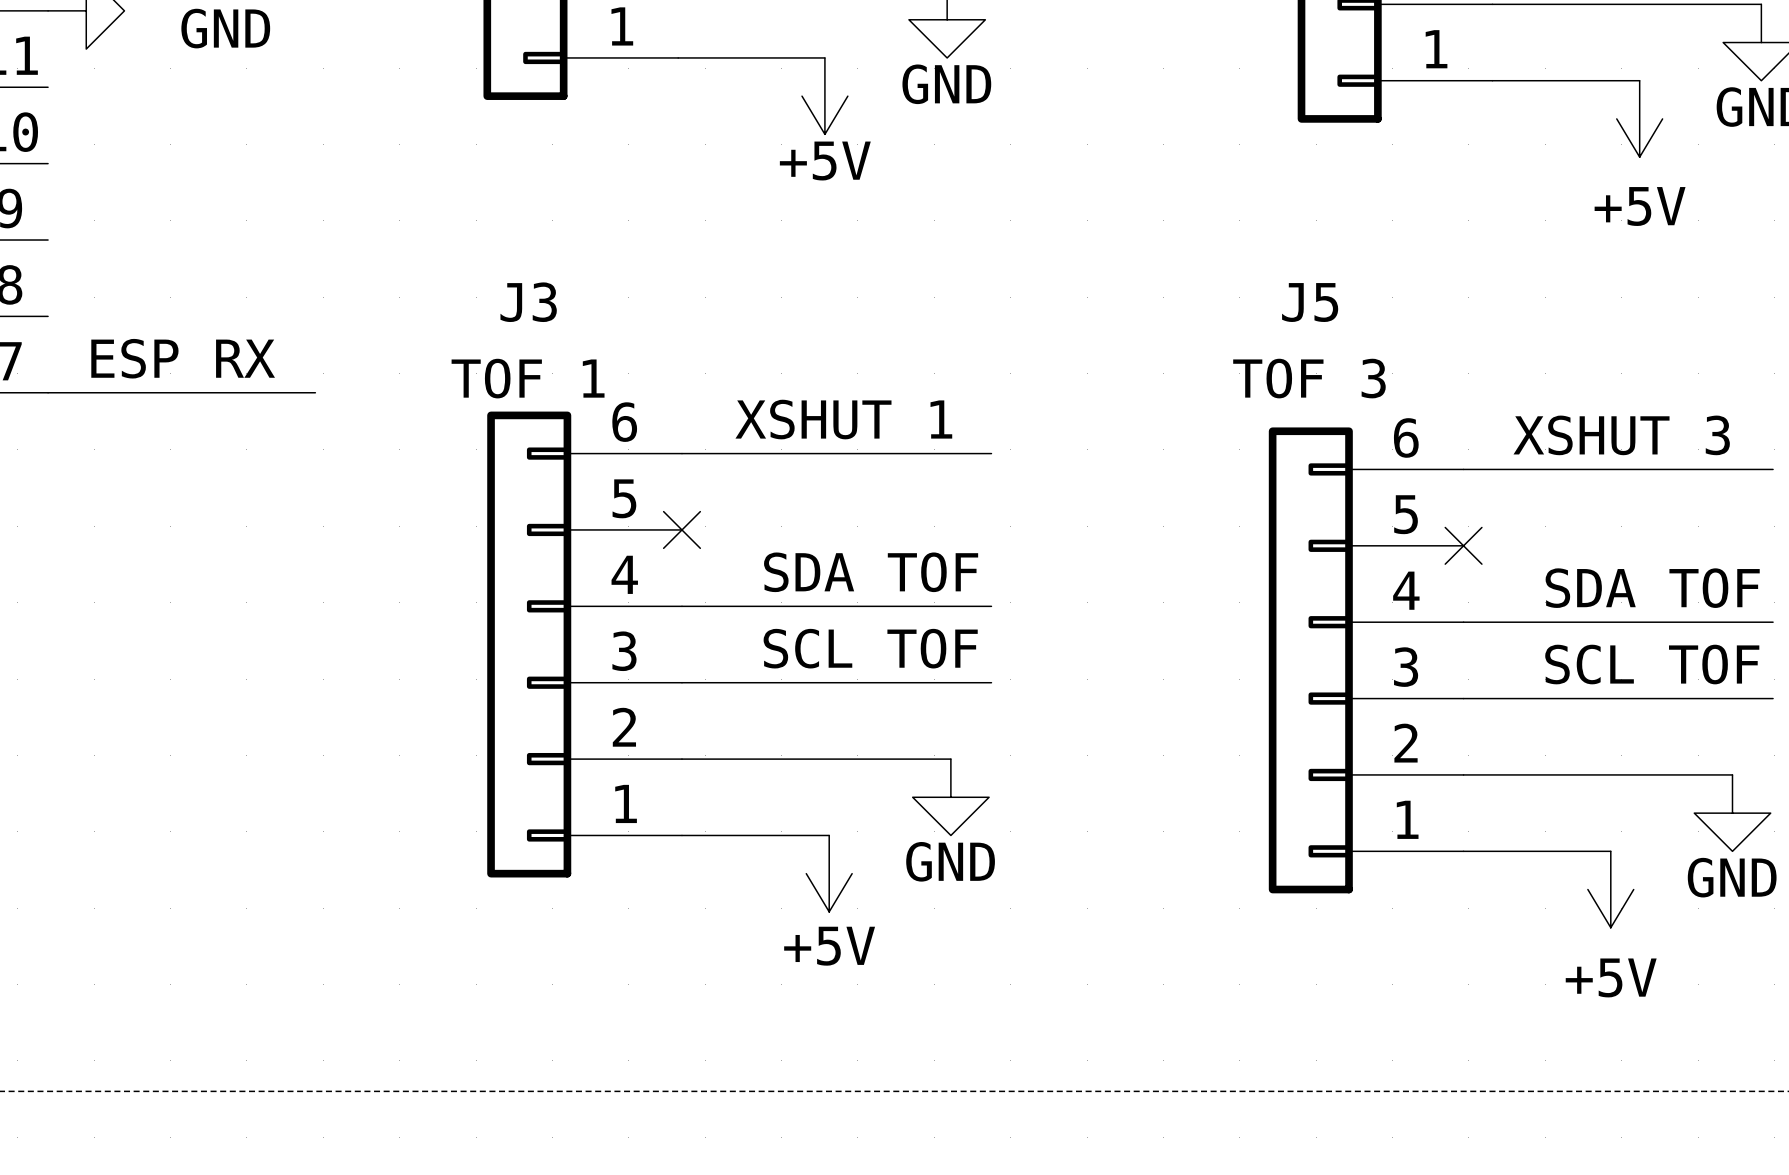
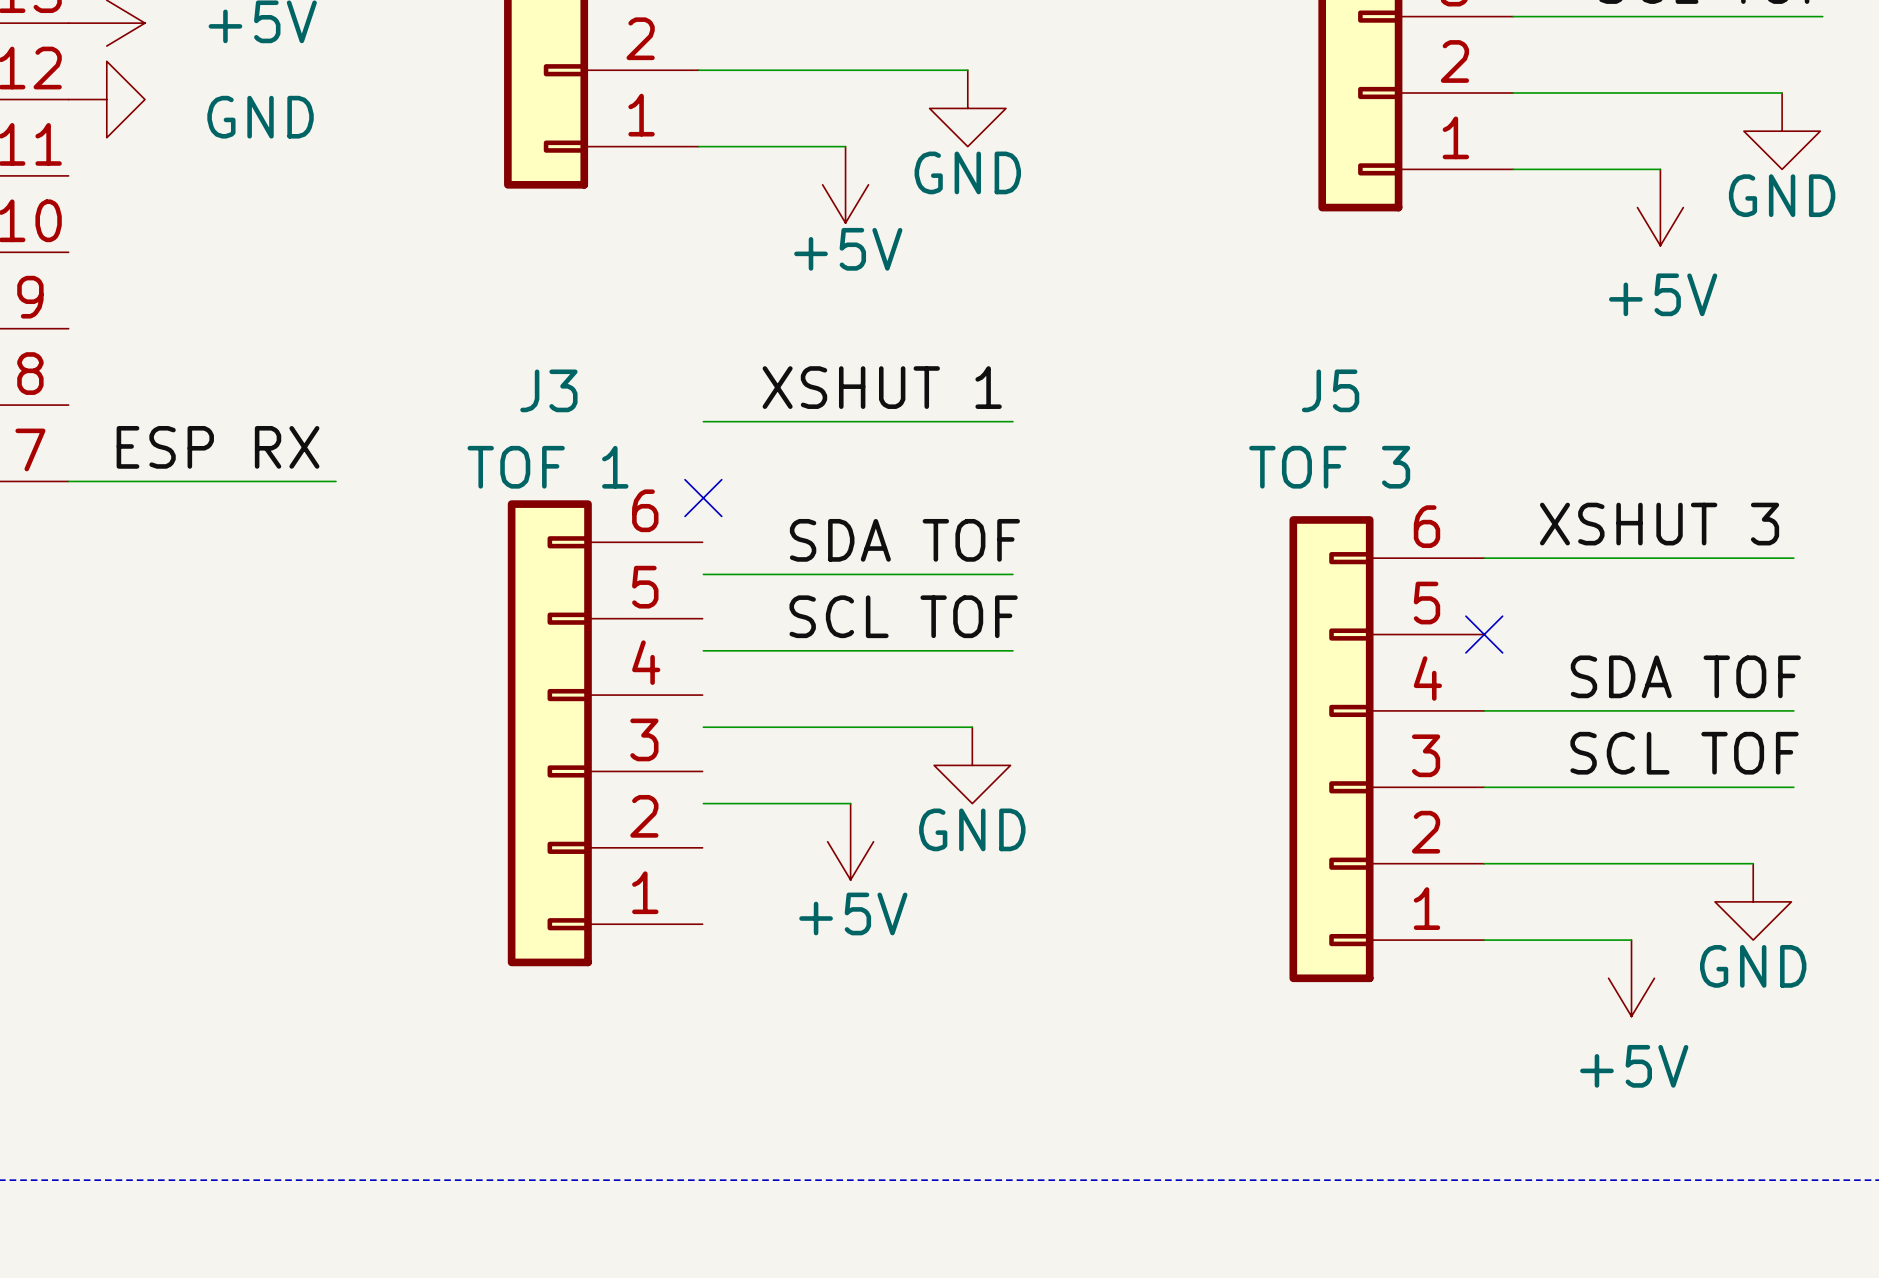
label position: XSHUT 1 (843, 419) -> XSHUT 1 (882, 387)
wire: (681, 453) (991, 453) -> (703, 421) (1012, 421)
no-connect mark position: (681, 529) -> (703, 498)
label position: SDA TOF (871, 572) -> SDA TOF (904, 540)
wire: (681, 606) (991, 606) -> (703, 574) (1012, 574)
label position: SCL TOF (870, 648) -> SCL TOF (903, 616)
wire: (681, 682) (991, 682) -> (703, 650) (1012, 650)
wire: (681, 759) (950, 759) -> (703, 727) (972, 727)
power symbol position: GND (950, 797) -> GND (972, 765)
wire: (681, 835) (829, 835) -> (703, 803) (850, 803)
power symbol position: +5V (829, 873) -> +5V (850, 841)

